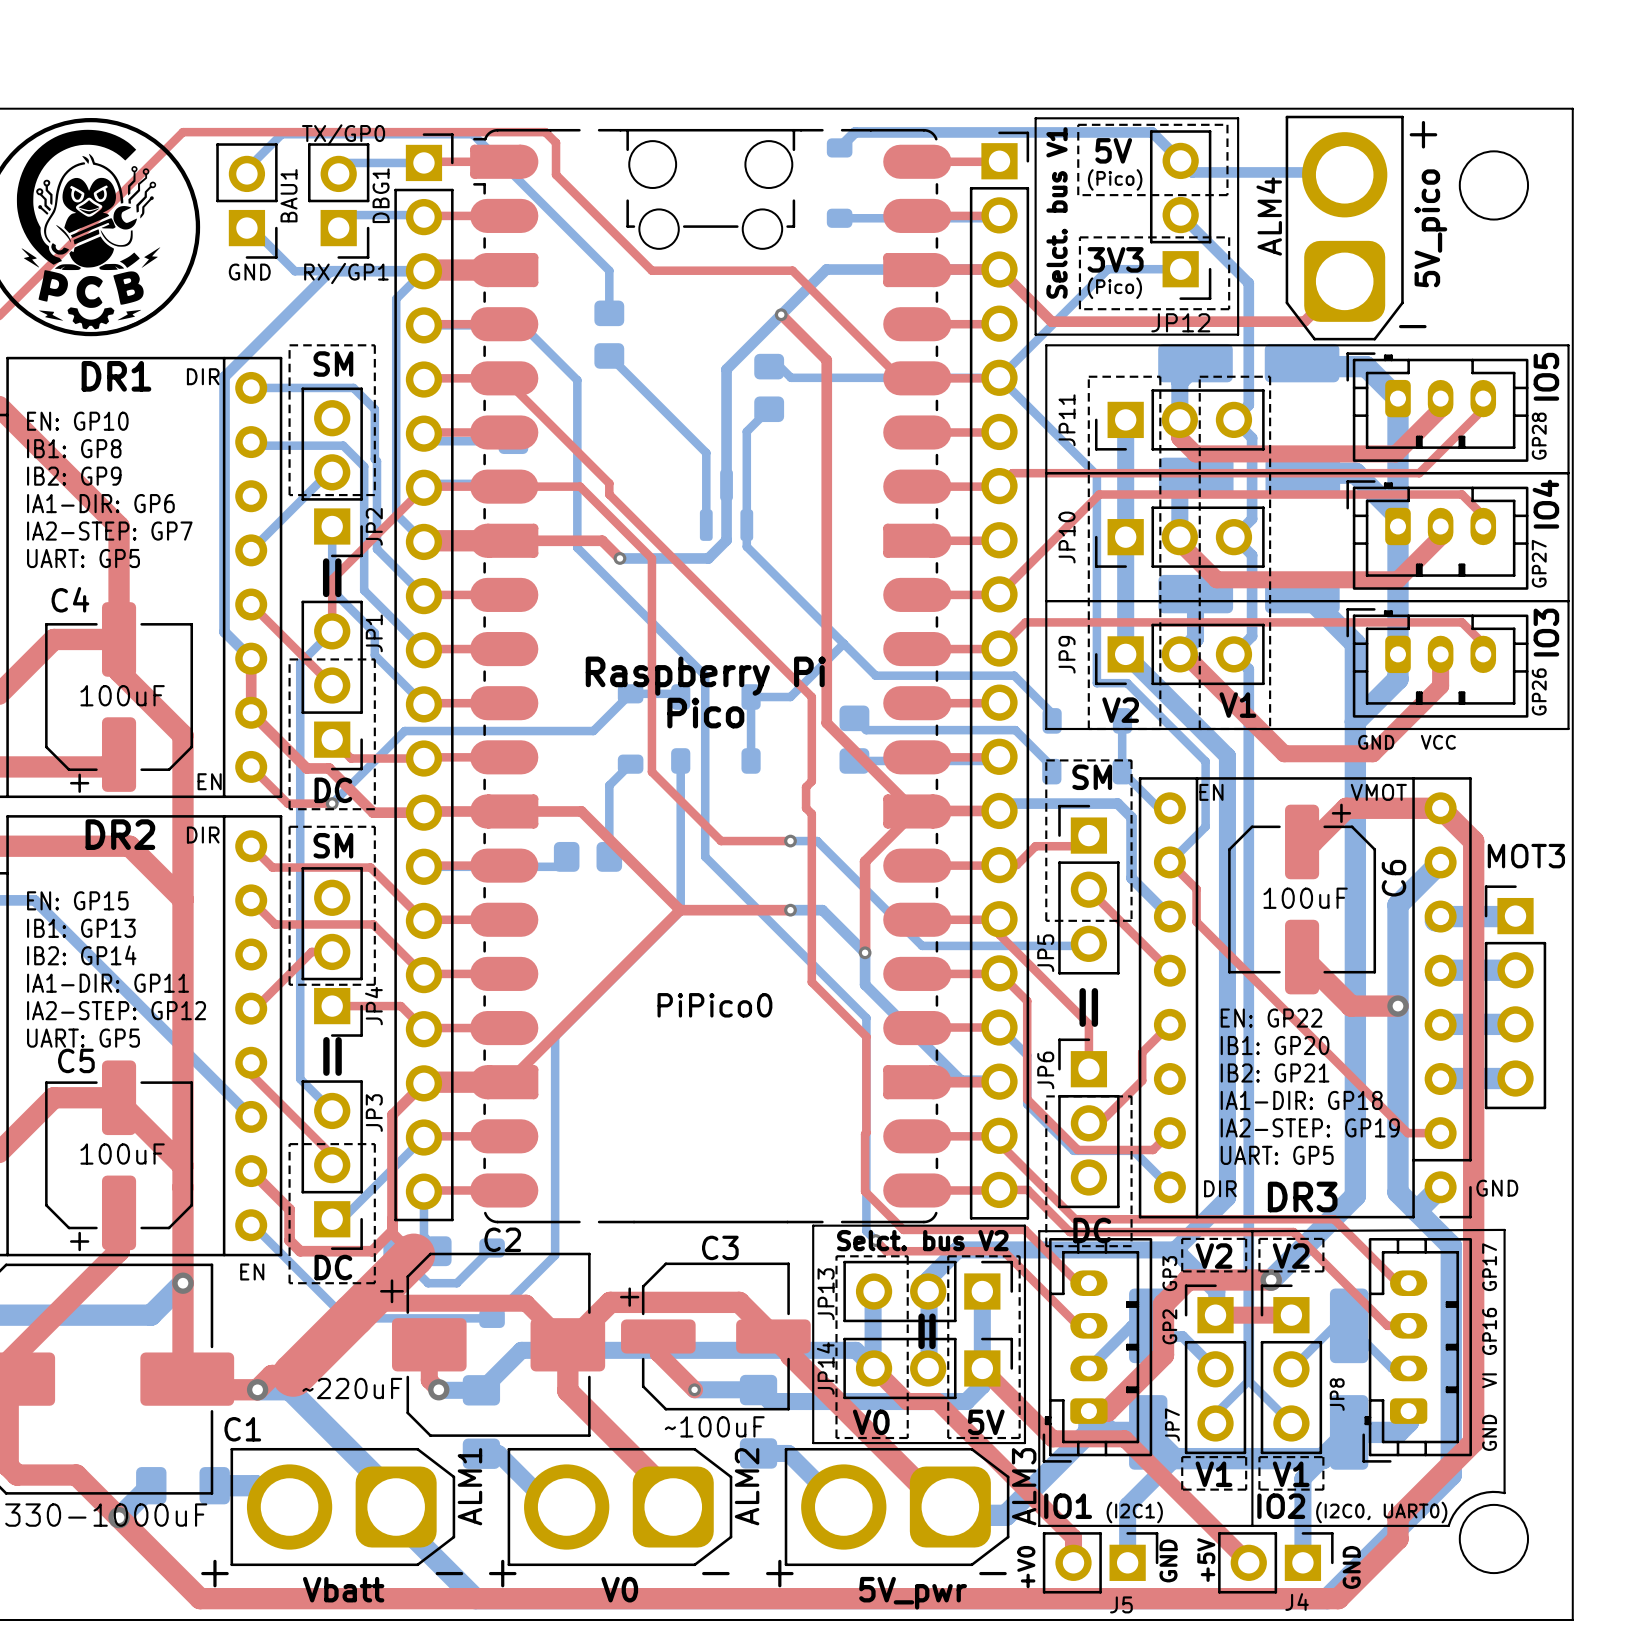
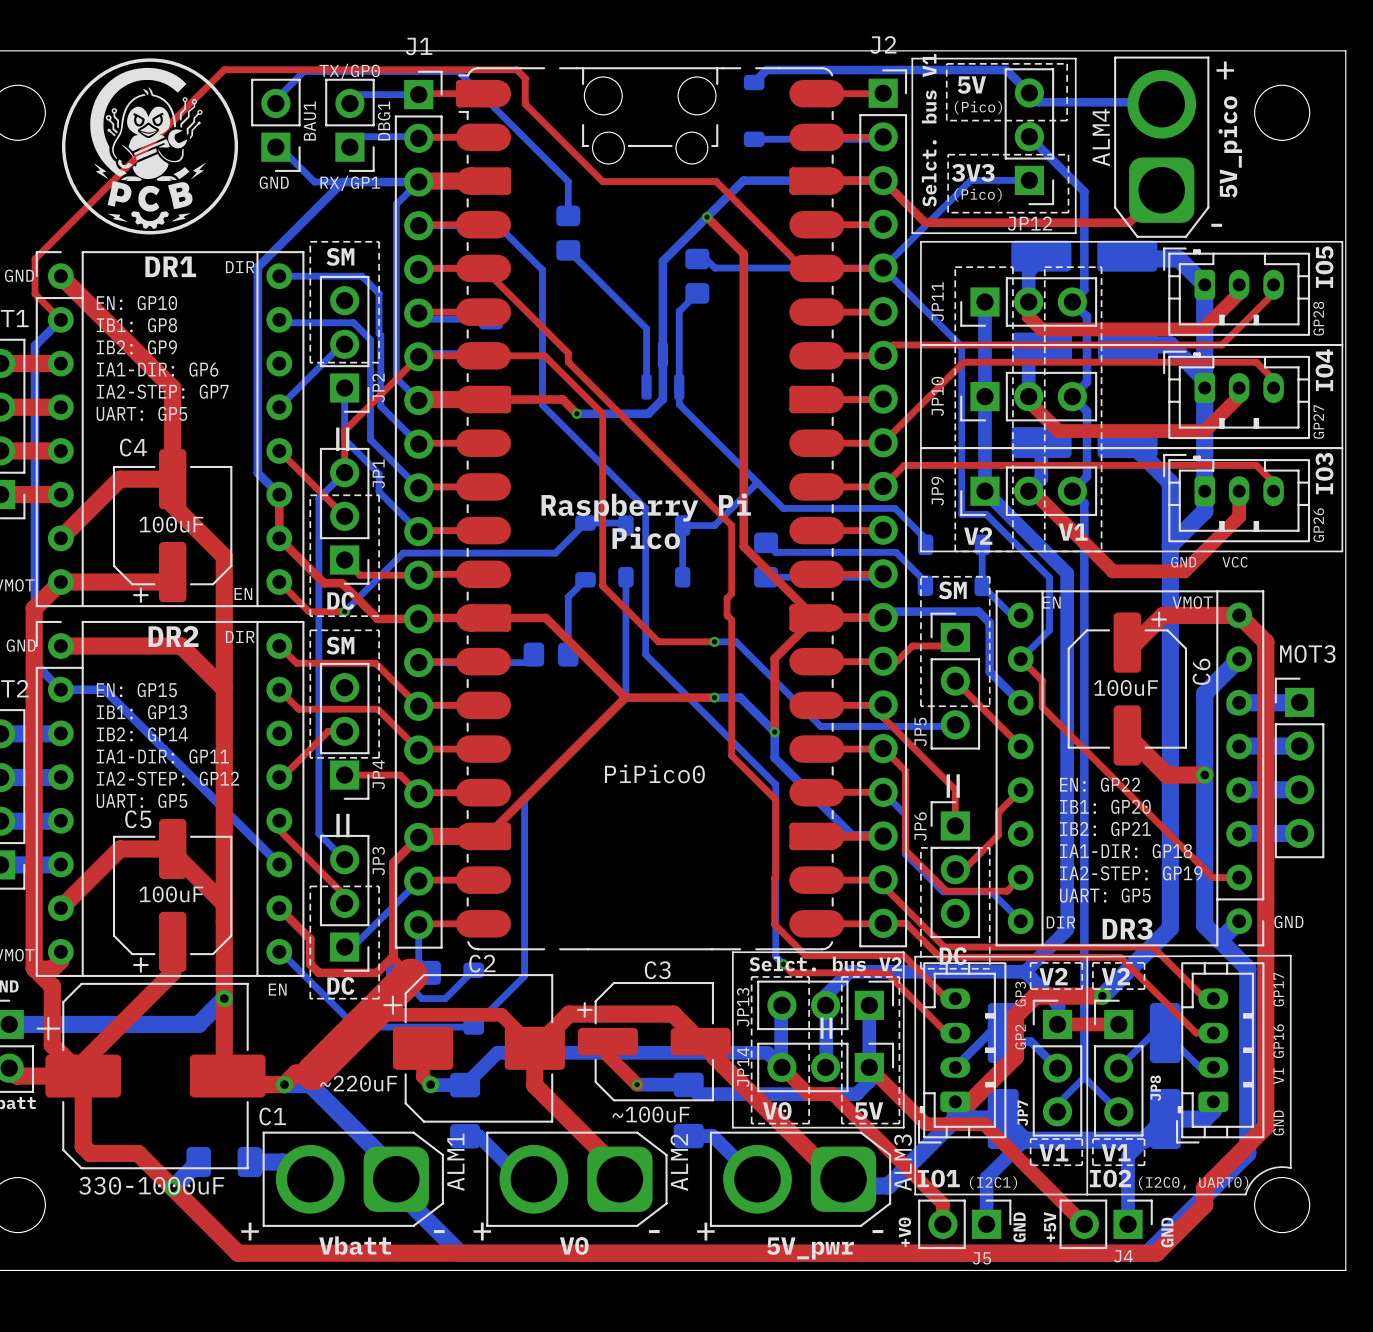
J2 name: none -> J2 (883, 44)
J1 name: none -> J1 (419, 46)

